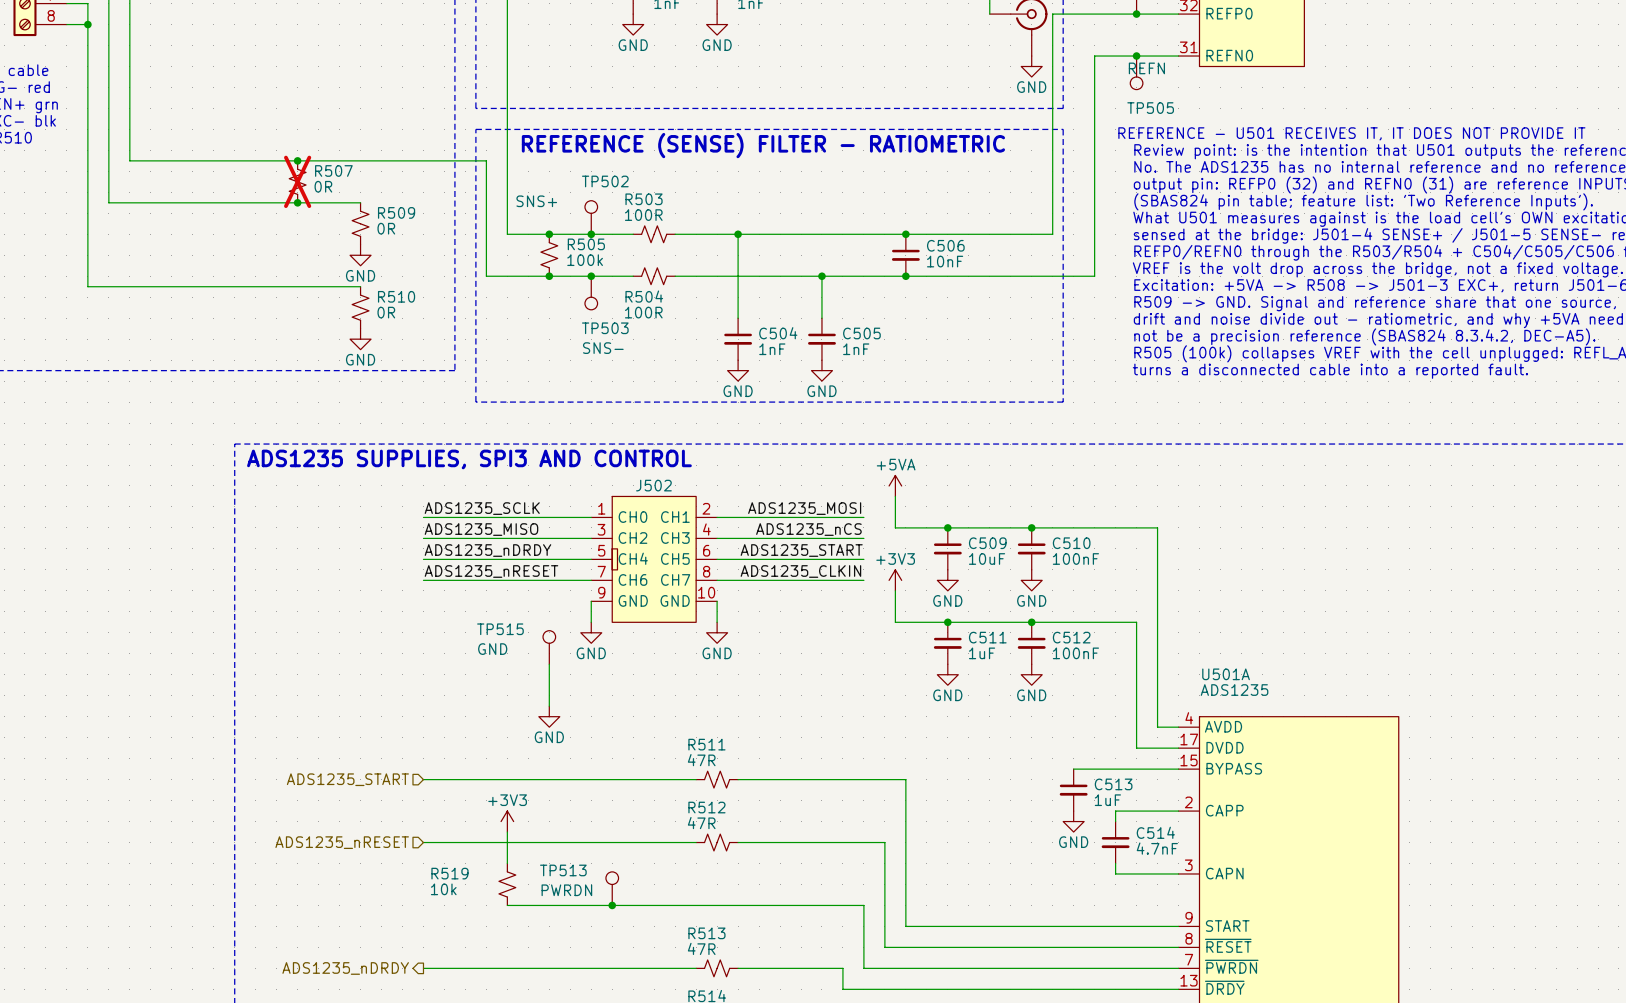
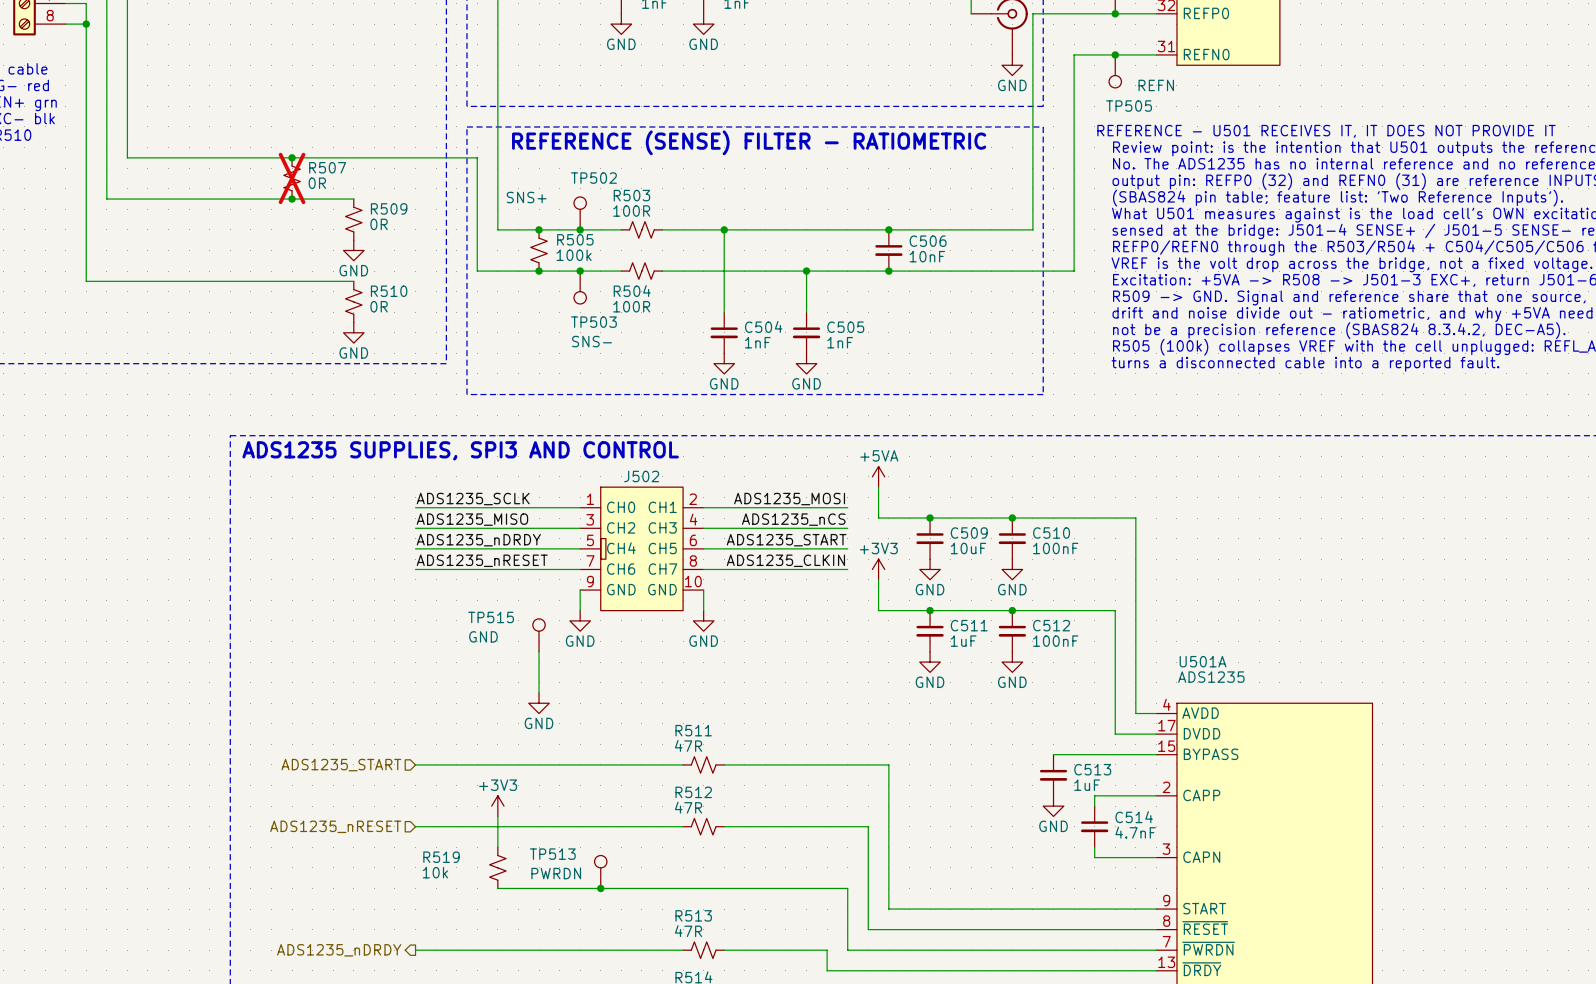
TP505 value position: REFN (1146, 68) -> REFN (1156, 85)

